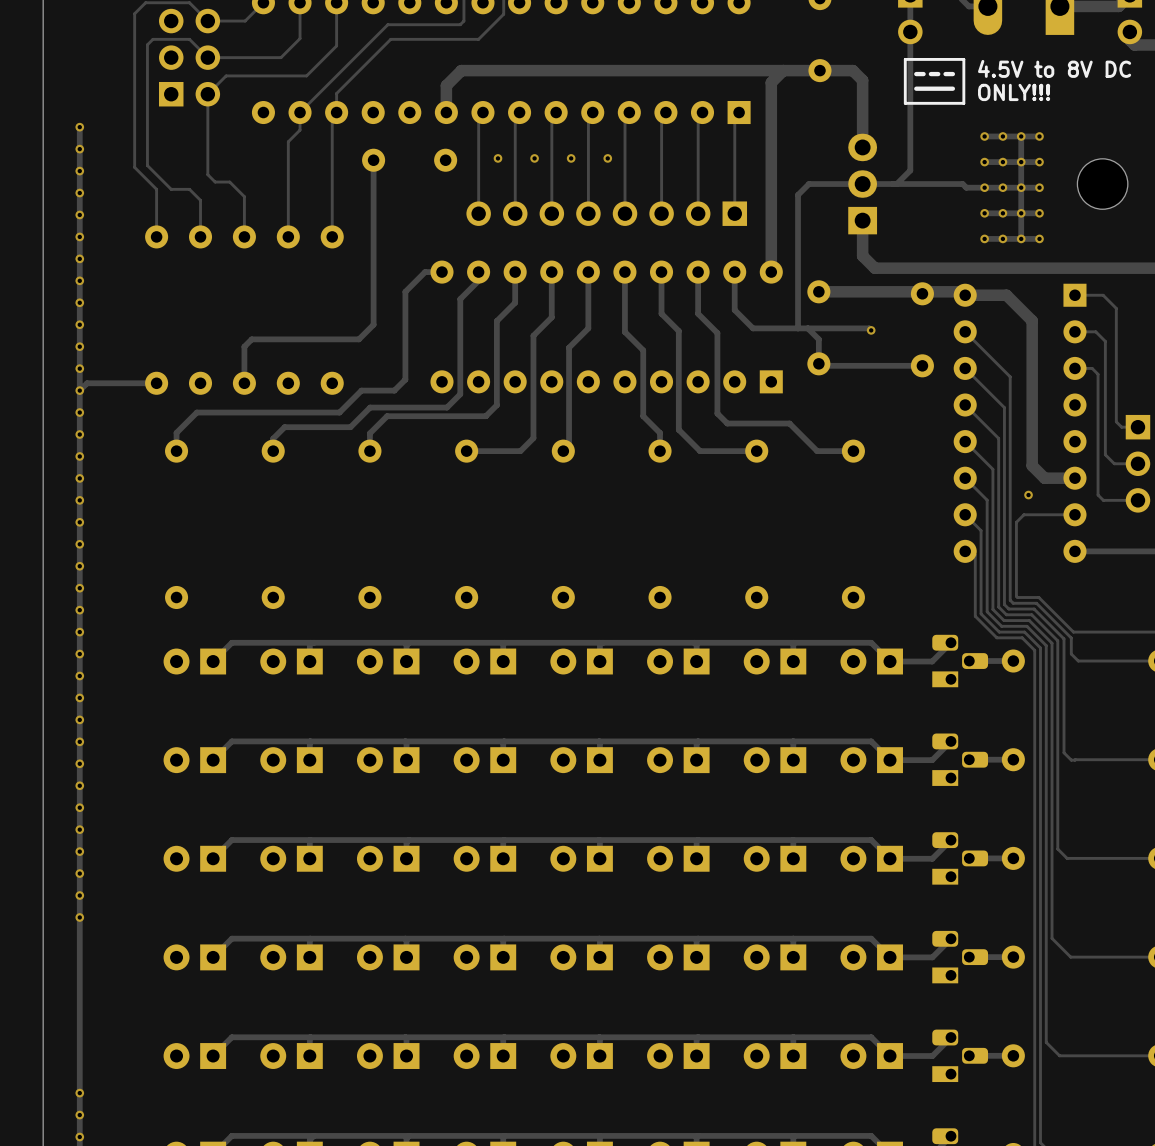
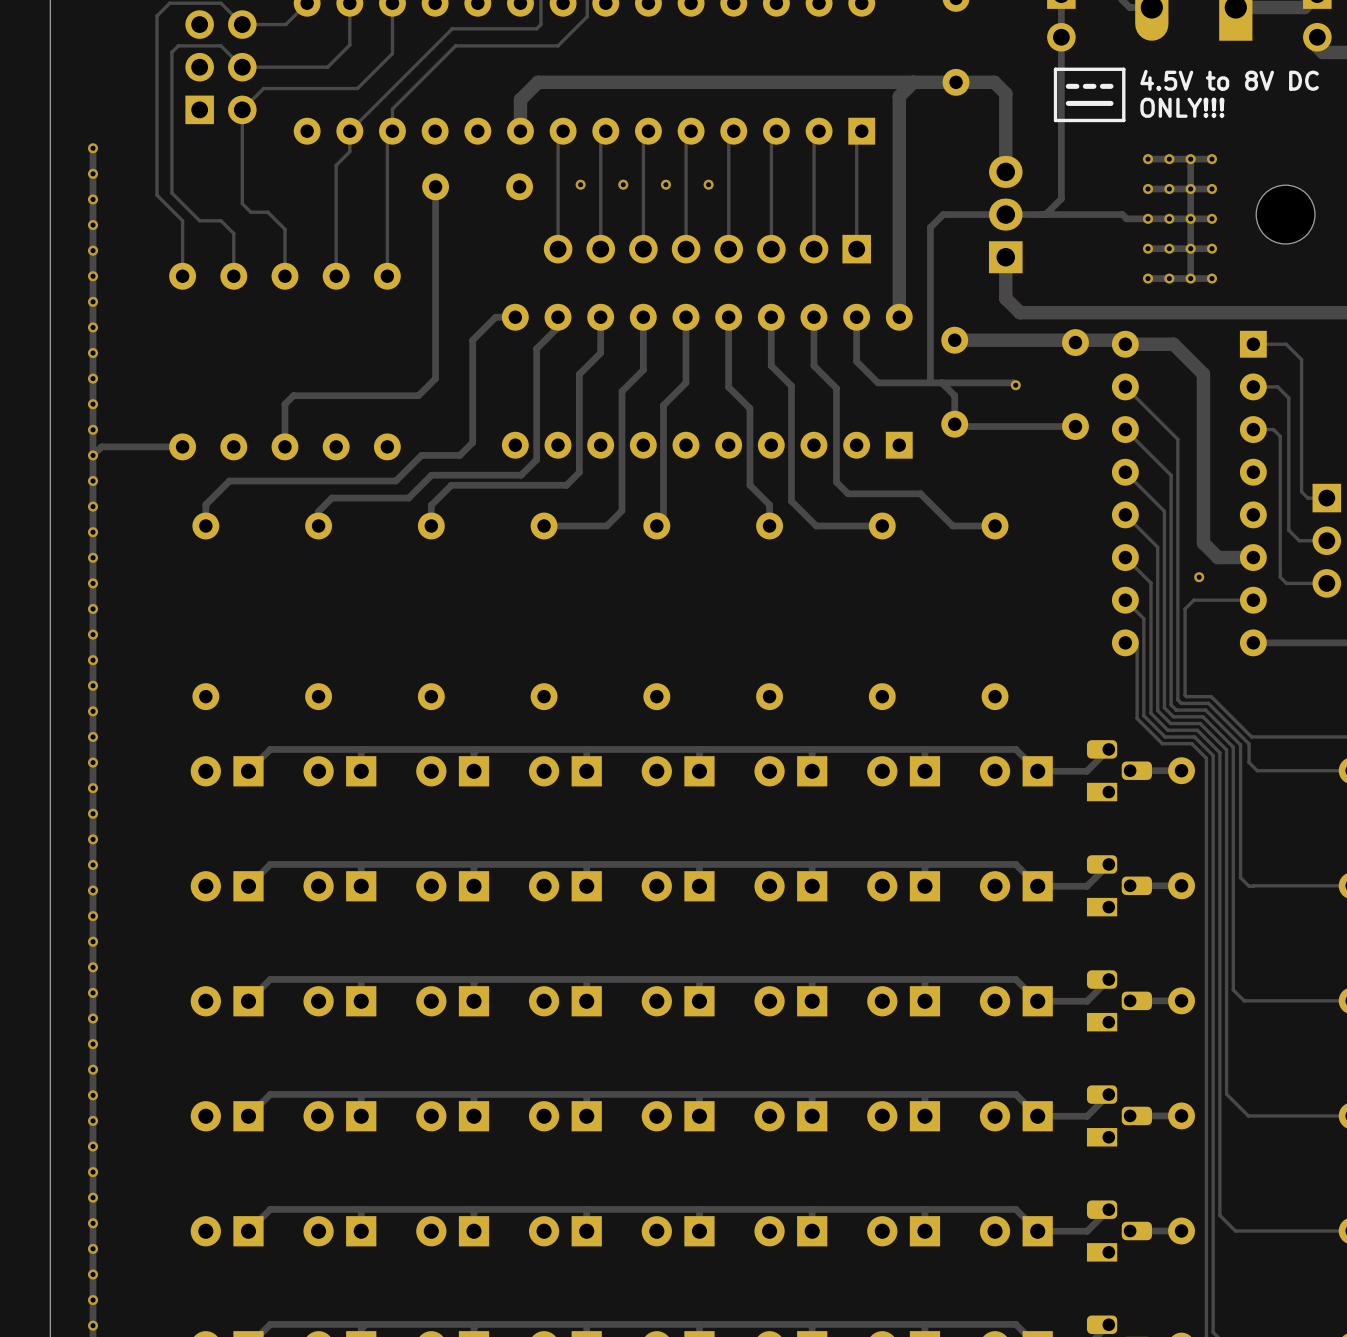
via: none -> (93, 1095)
via: none -> (93, 1120)
via: none -> (93, 1146)
via: none -> (93, 1172)
via: none -> (93, 1197)
via: none -> (93, 1223)
via: none -> (93, 1248)

